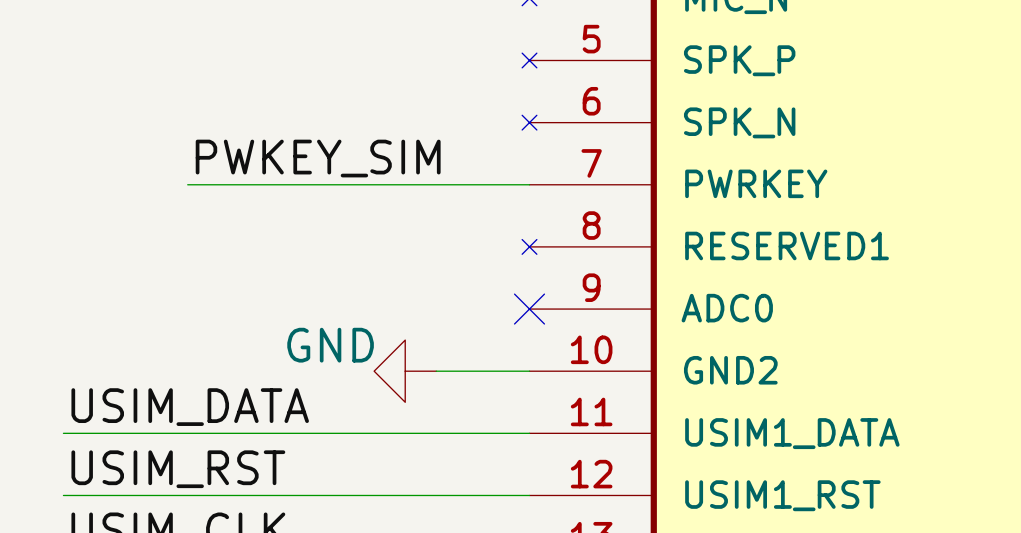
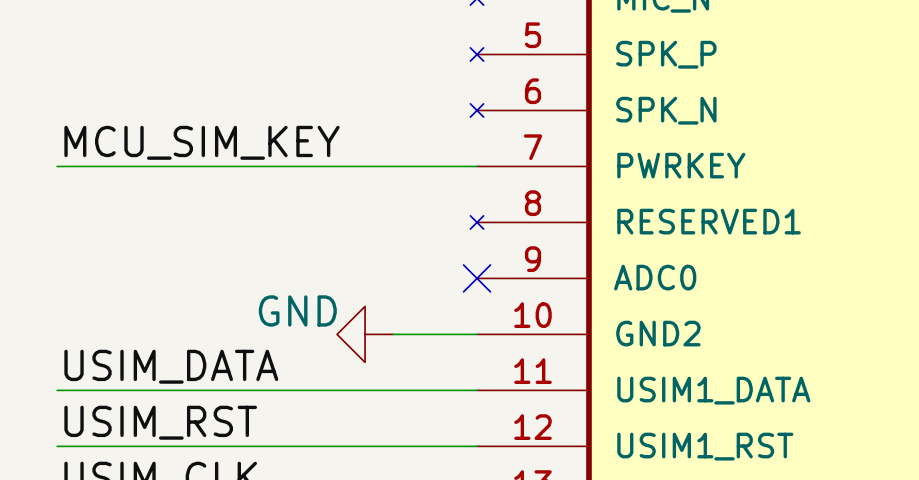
label: none -> MCU_SIM_KEY (201, 142)
label: PWKEY_SIM (318, 158) -> none
wire: none -> (57, 166) (169, 166)

